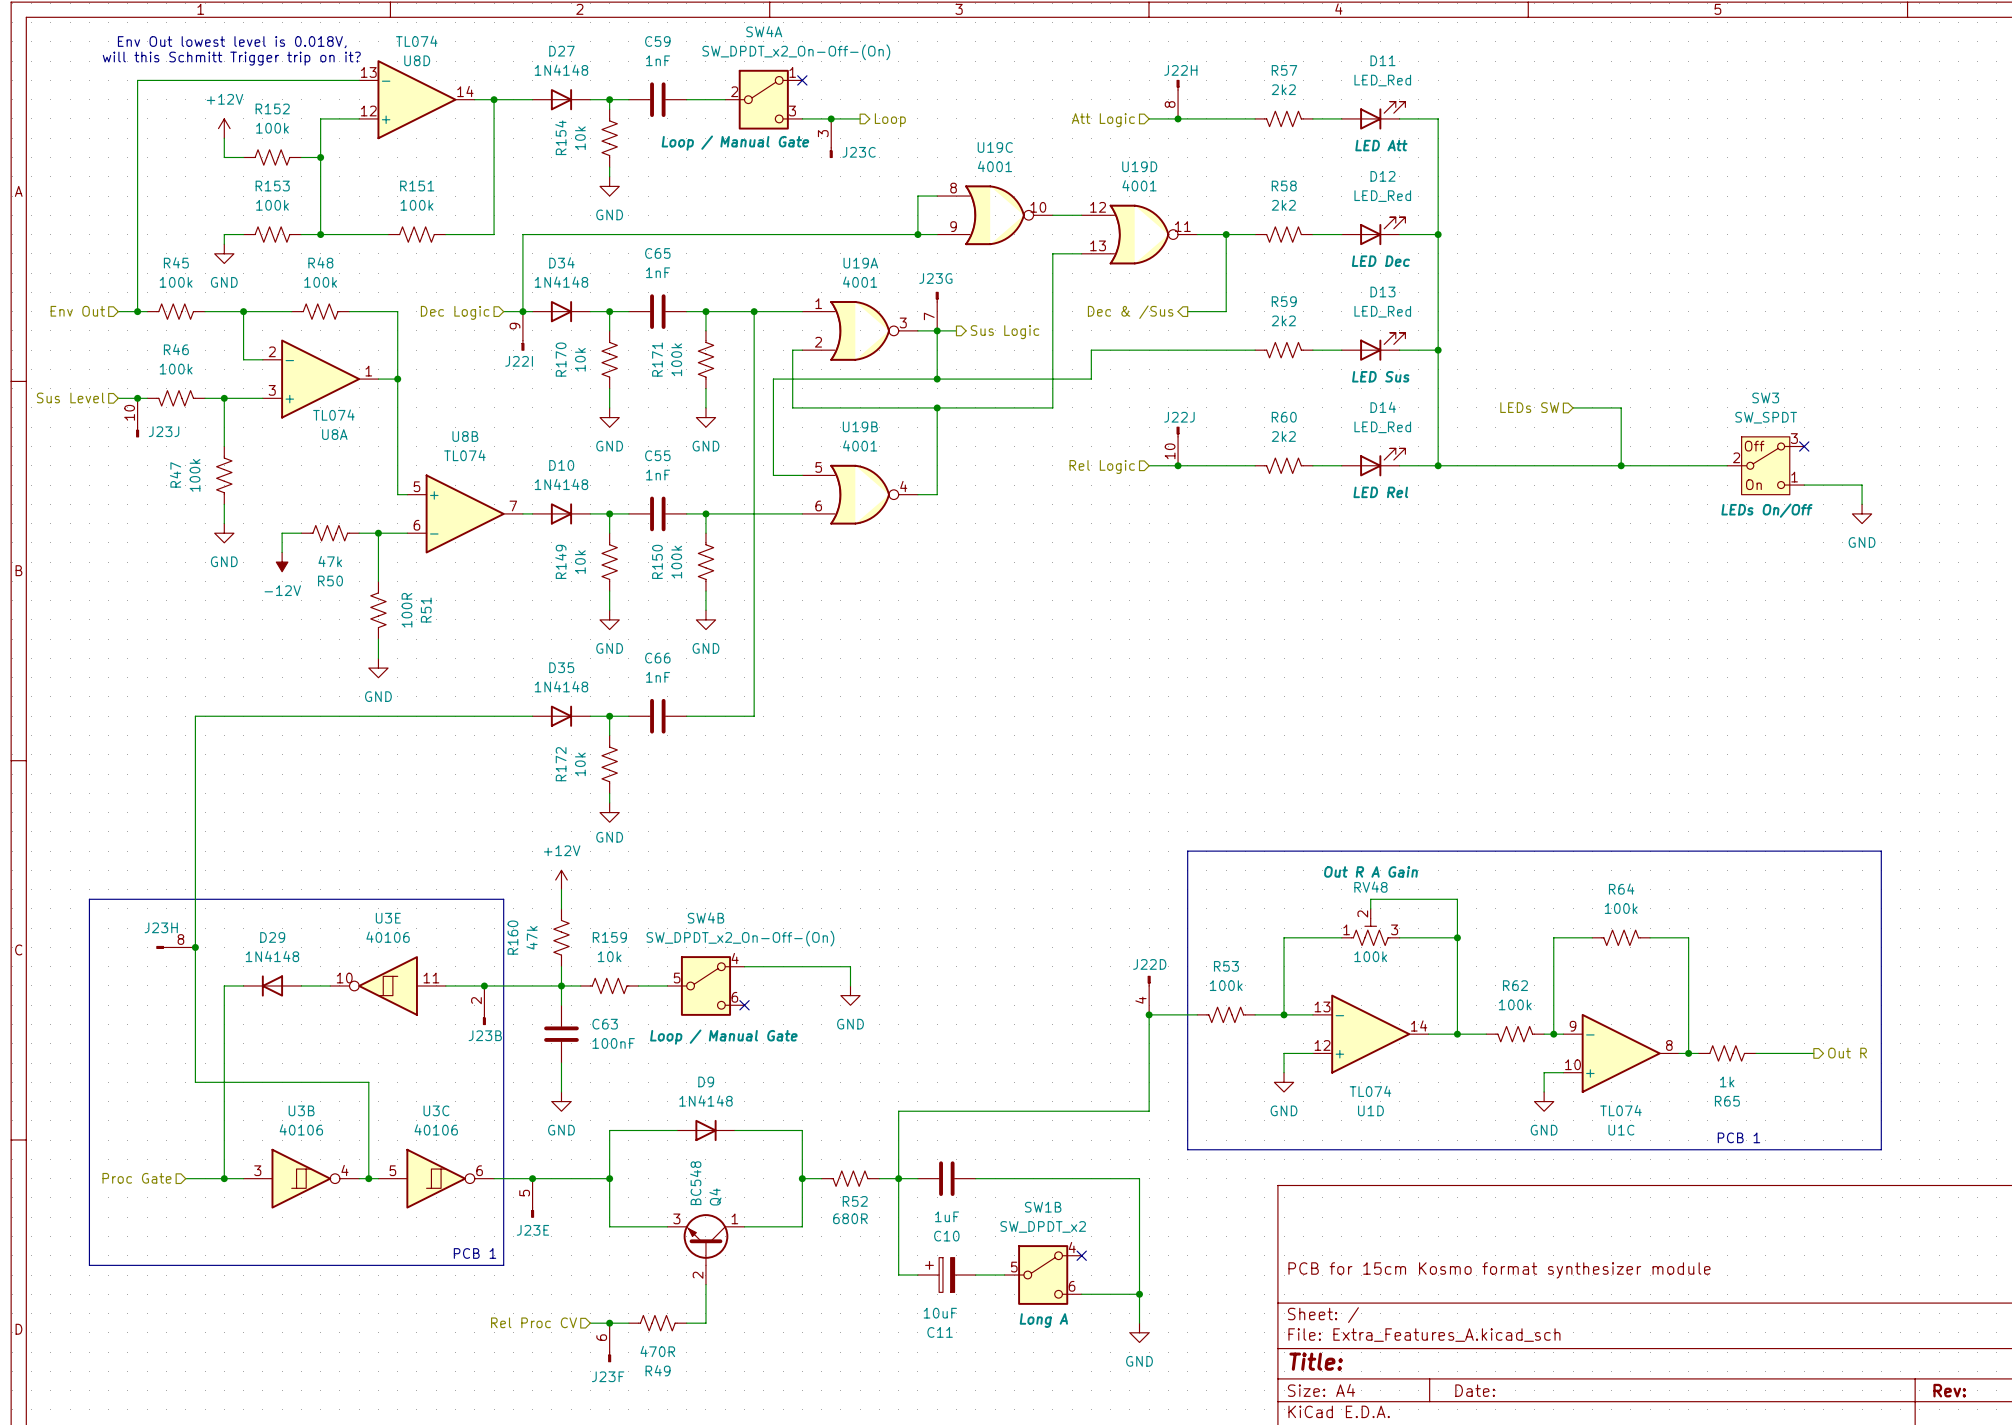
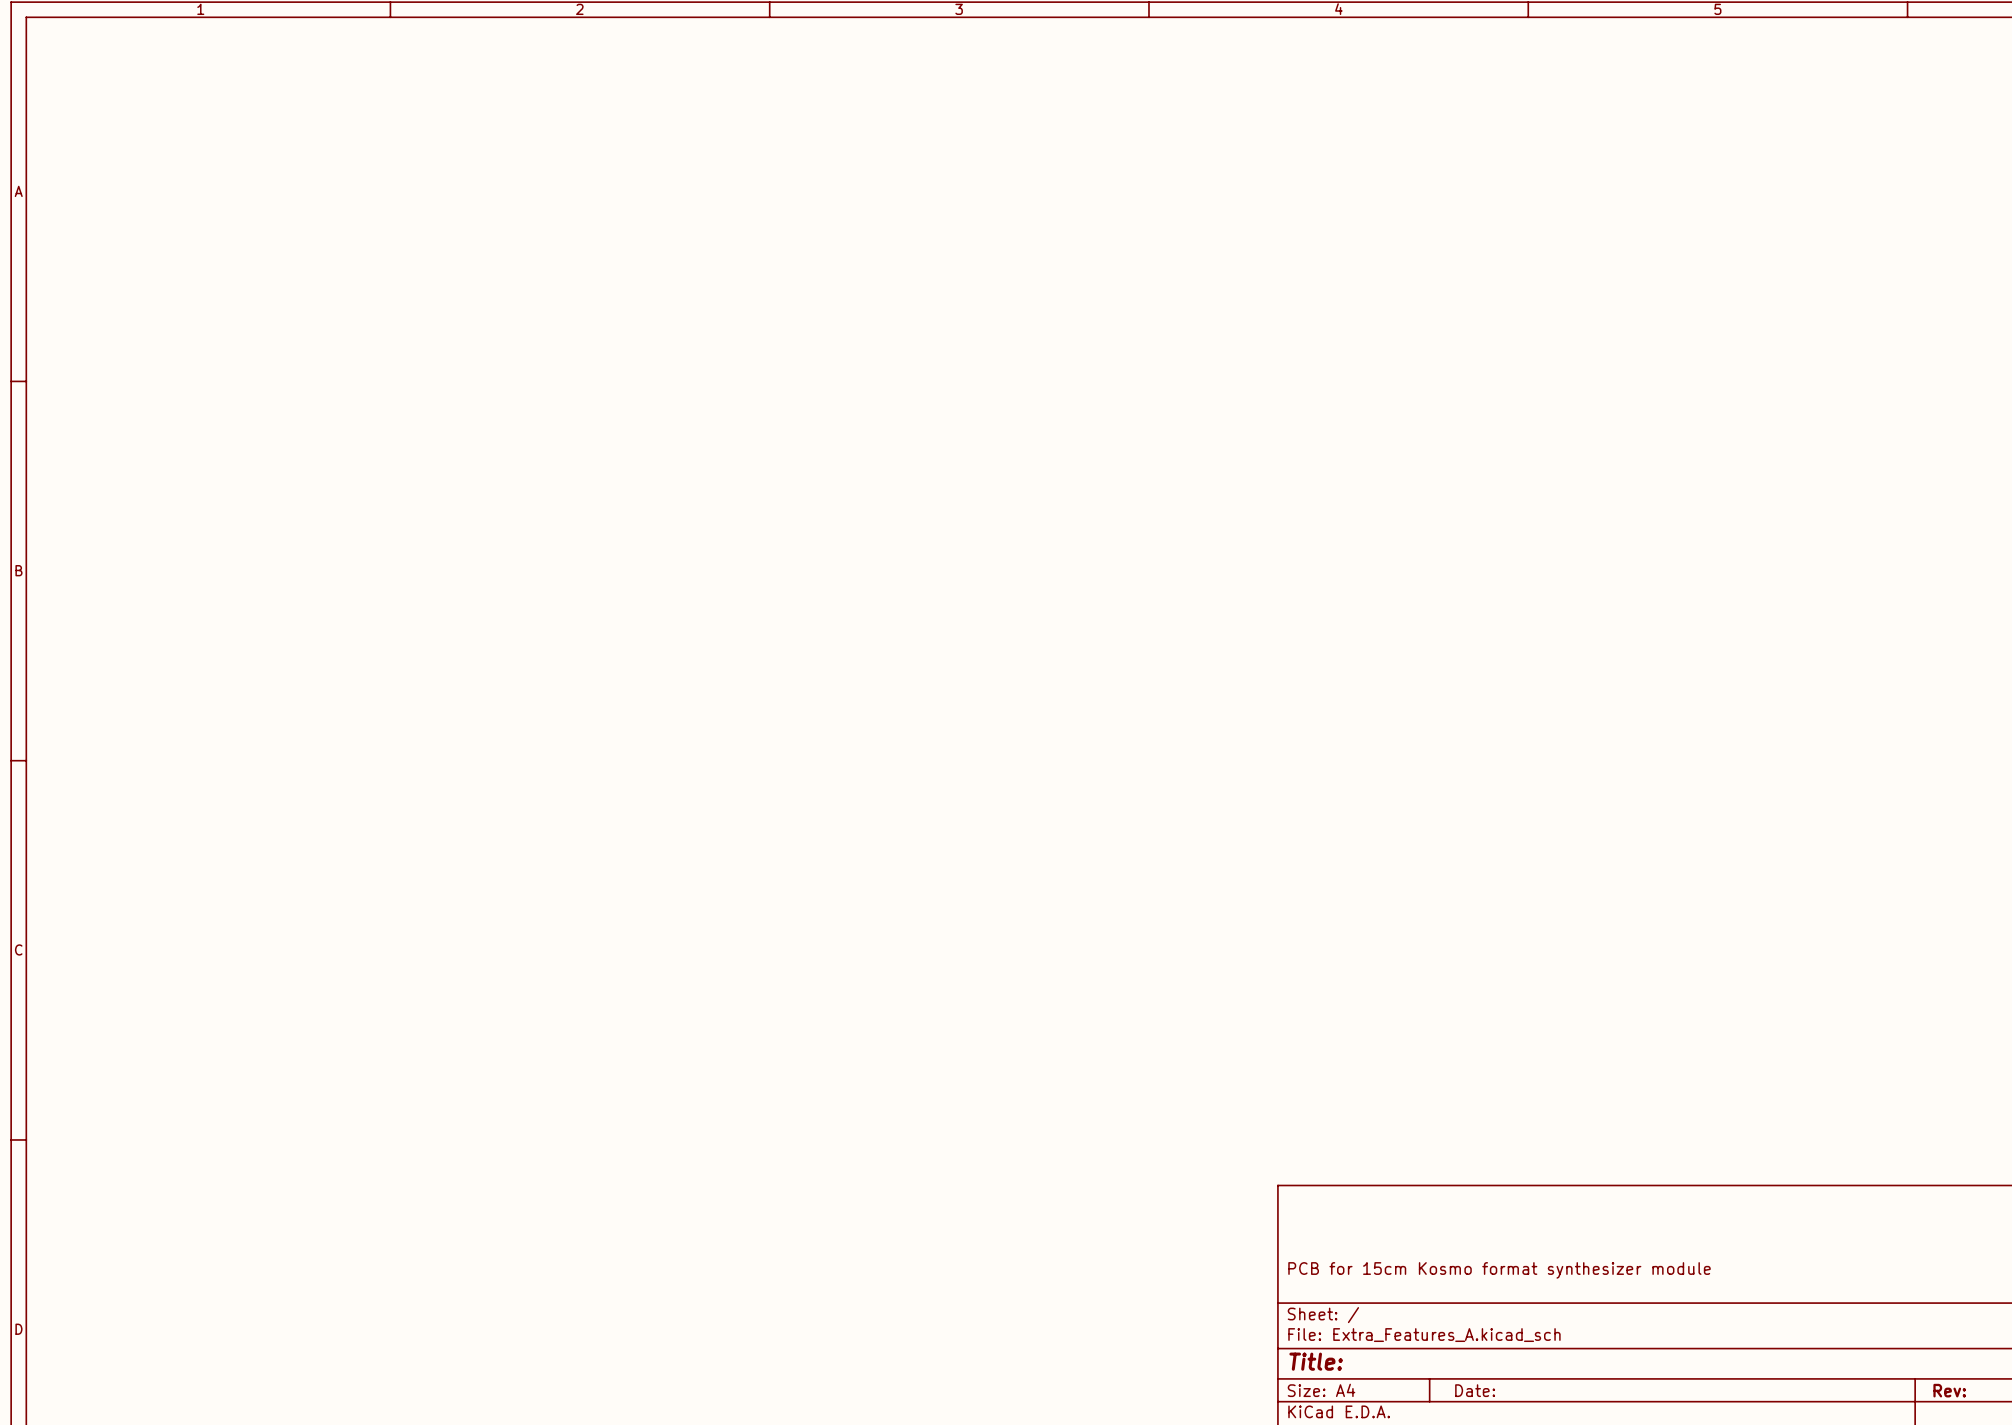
text: Env Out lowest level is 0.018V, (232, 42) -> none
text: will this Schmitt Trigger trip on it? (231, 58) -> none
wire: (359, 80) (137, 80) (137, 311) -> none
no-connect mark: (802, 80) -> none
U8D: TL074 (416, 99) -> none
wire: (474, 99) (532, 99) -> none
wire: (494, 99) (494, 234) (445, 234) -> none
junction: (494, 99) -> none
D27: 1N4148 (561, 99) -> none
wire: (590, 99) (628, 99) -> none
wire: (609, 99) (609, 109) -> none
junction: (609, 99) -> none
C59: 1nF (657, 99) -> none
wire: (686, 99) (725, 99) -> none
SW4A: SW_DPDT_x2_On-Off-(On) (763, 99) -> none
J22H: (1178, 99) -> none
D11: LED_Red (1373, 115) -> none
wire: (359, 118) (320, 118) (320, 234) -> none
wire: (802, 118) (860, 118) -> none
junction: (831, 118) -> none
wire: (1149, 118) (1255, 118) -> none
junction: (1178, 118) -> none
R57: 2k2 (1284, 118) -> none
wire: (1312, 118) (1341, 118) -> none
wire: (1399, 118) (1438, 118) (1438, 465) -> none
hierarchical label: Loop (890, 120) -> none
hierarchical label: Att Logic (1103, 120) -> none
power symbol: +12V (224, 128) -> none
wire: (224, 138) (224, 157) (243, 157) -> none
R154: 10k (609, 138) -> none
J23C: (831, 138) -> none
R152: 100k (272, 157) -> none
wire: (301, 157) (320, 157) -> none
junction: (320, 157) -> none
wire: (609, 167) (609, 176) -> none
power symbol: GND (609, 186) -> none
wire: (937, 196) (917, 196) (917, 234) -> none
U19C: 4001 (995, 215) -> none
wire: (1052, 215) (1081, 215) -> none
D12: LED_Red (1373, 231) -> none
wire: (243, 234) (224, 234) (224, 244) -> none
R153: 100k (272, 234) -> none
wire: (301, 234) (388, 234) -> none
junction: (320, 234) -> none
R151: 100k (416, 234) -> none
junction: (917, 234) -> none
wire: (937, 234) (522, 234) (522, 311) -> none
U19D: 4001 (1139, 234) -> none
wire: (1197, 234) (1255, 234) -> none
wire: (1226, 234) (1226, 311) (1187, 311) -> none
junction: (1226, 234) -> none
R58: 2k2 (1284, 234) -> none
wire: (1312, 234) (1341, 234) -> none
wire: (1399, 234) (1438, 234) -> none
junction: (1438, 234) -> none
power symbol: GND (224, 253) -> none
wire: (1081, 253) (1052, 253) (1052, 407) (792, 407) (792, 350) (802, 350) -> none
hierarchical label: Env Out (77, 311) -> none
wire: (118, 311) (147, 311) -> none
junction: (137, 311) -> none
R45: 100k (176, 311) -> none
wire: (205, 311) (291, 311) -> none
wire: (243, 311) (243, 359) (262, 359) -> none
junction: (243, 311) -> none
R48: 100k (320, 311) -> none
wire: (349, 311) (397, 311) (397, 494) (407, 494) -> none
wire: (503, 311) (532, 311) -> none
junction: (522, 311) -> none
D34: 1N4148 (561, 311) -> none
wire: (590, 311) (628, 311) -> none
wire: (609, 311) (609, 330) -> none
junction: (609, 311) -> none
C65: 1nF (657, 311) -> none
wire: (686, 311) (802, 311) -> none
wire: (705, 311) (705, 330) -> none
junction: (705, 311) -> none
wire: (754, 311) (754, 716) (686, 716) -> none
junction: (754, 311) -> none
J23G: (937, 311) -> none
hierarchical label: Dec Logic (455, 312) -> none
hierarchical label: Dec & /Sus (1130, 312) -> none
U19A: 4001 (860, 330) -> none
wire: (917, 330) (956, 330) -> none
wire: (937, 330) (937, 379) -> none
junction: (937, 330) -> none
J22I: (522, 331) -> none
hierarchical label: Sus Logic (1005, 332) -> none
D13: LED_Red (1373, 346) -> none
wire: (1255, 350) (1091, 350) (1091, 379) (773, 379) (773, 475) (802, 475) -> none
R59: 2k2 (1284, 350) -> none
wire: (1312, 350) (1341, 350) -> none
wire: (1399, 350) (1438, 350) -> none
junction: (1438, 350) -> none
R170: 10k (609, 359) -> none
R171: 100k (705, 359) -> none
U8A: TL074 (320, 379) -> none
wire: (378, 379) (397, 379) -> none
junction: (397, 379) -> none
junction: (937, 379) -> none
wire: (609, 388) (609, 407) -> none
wire: (705, 388) (705, 407) -> none
hierarchical label: Sus Level (70, 397) -> none
wire: (118, 398) (147, 398) -> none
junction: (137, 398) -> none
R46: 100k (176, 398) -> none
wire: (205, 398) (262, 398) -> none
wire: (224, 398) (224, 446) -> none
junction: (224, 398) -> none
wire: (937, 407) (937, 494) (917, 494) -> none
junction: (937, 407) -> none
hierarchical label: LEDs SW (1529, 407) -> none
wire: (1573, 407) (1621, 407) (1621, 465) -> none
J23J: (137, 417) -> none
power symbol: GND (609, 417) -> none
power symbol: GND (705, 417) -> none
J22J: (1178, 446) -> none
no-connect mark: (1804, 446) -> none
D14: LED_Red (1373, 462) -> none
wire: (1149, 465) (1255, 465) -> none
junction: (1178, 465) -> none
R60: 2k2 (1284, 465) -> none
wire: (1312, 465) (1341, 465) -> none
wire: (1399, 465) (1727, 465) -> none
junction: (1438, 465) -> none
junction: (1621, 465) -> none
SW3: SW_SPDT (1765, 465) -> none
hierarchical label: Rel Logic (1102, 467) -> none
R47: 100k (224, 475) -> none
wire: (1804, 485) (1862, 485) (1862, 504) -> none
U19B: 4001 (860, 494) -> none
wire: (224, 504) (224, 523) -> none
U8B: TL074 (465, 513) -> none
wire: (522, 513) (532, 513) -> none
D10: 1N4148 (561, 513) -> none
wire: (590, 513) (628, 513) -> none
wire: (609, 513) (609, 533) -> none
junction: (609, 513) -> none
C55: 1nF (657, 513) -> none
wire: (686, 513) (802, 513) -> none
wire: (705, 513) (705, 533) -> none
junction: (705, 513) -> none
power symbol: GND (1862, 513) -> none
power symbol: GND (224, 533) -> none
wire: (301, 533) (282, 533) (282, 552) -> none
R50: 47k (330, 533) -> none
wire: (359, 533) (407, 533) -> none
wire: (378, 533) (378, 581) -> none
junction: (378, 533) -> none
power symbol: -12V (282, 562) -> none
R149: 10k (609, 562) -> none
R150: 100k (705, 562) -> none
wire: (609, 591) (609, 610) -> none
wire: (705, 591) (705, 610) -> none
R51: 100R (378, 610) -> none
power symbol: GND (609, 619) -> none
power symbol: GND (705, 619) -> none
wire: (378, 639) (378, 658) -> none
power symbol: GND (378, 668) -> none
wire: (532, 716) (195, 716) (195, 1082) (368, 1082) (368, 1178) -> none
D35: 1N4148 (561, 716) -> none
wire: (590, 716) (628, 716) -> none
wire: (609, 716) (609, 735) -> none
junction: (609, 716) -> none
C66: 1nF (657, 716) -> none
R172: 10k (609, 764) -> none
wire: (609, 793) (609, 802) -> none
power symbol: GND (609, 812) -> none
line: (1187, 851) (1881, 851) (1881, 1149) (1187, 1149) (1187, 851) -> none
power symbol: +12V (561, 880) -> none
wire: (561, 889) (561, 908) -> none
line: (89, 899) (503, 899) (503, 1265) (89, 1265) (89, 899) -> none
wire: (1370, 908) (1370, 899) (1457, 899) (1457, 1034) -> none
RV48: 100k (1370, 927) -> none
R160: 47k (561, 937) -> none
wire: (1341, 937) (1284, 937) (1284, 1014) -> none
wire: (1399, 937) (1457, 937) -> none
junction: (1457, 937) -> none
wire: (1592, 937) (1553, 937) (1553, 1034) -> none
R64: 100k (1621, 937) -> none
wire: (1650, 937) (1688, 937) (1688, 1053) -> none
J23H: (175, 947) -> none
junction: (195, 947) -> none
wire: (561, 966) (561, 1005) -> none
wire: (744, 966) (850, 966) (850, 985) -> none
wire: (243, 985) (224, 985) (224, 1178) -> none
D29: 1N4148 (272, 985) -> none
wire: (301, 985) (330, 985) -> none
U3E: 40106 (388, 985) -> none
wire: (445, 985) (580, 985) -> none
junction: (484, 985) -> none
junction: (561, 985) -> none
R159: 10k (609, 985) -> none
wire: (638, 985) (667, 985) -> none
SW4B: SW_DPDT_x2_On-Off-(On) (705, 985) -> none
power symbol: GND (850, 995) -> none
J22D: (1149, 995) -> none
J23B: (484, 1005) -> none
no-connect mark: (744, 1005) -> none
junction: (1149, 1014) -> none
wire: (1197, 1014) (1149, 1014) (1149, 1111) (898, 1111) (898, 1275) (917, 1275) -> none
R53: 100k (1226, 1014) -> none
wire: (1255, 1014) (1312, 1014) -> none
junction: (1284, 1014) -> none
C63: 100nF (561, 1034) -> none
U1D: TL074 (1370, 1034) -> none
wire: (1428, 1034) (1486, 1034) -> none
junction: (1457, 1034) -> none
R62: 100k (1515, 1034) -> none
wire: (1544, 1034) (1563, 1034) -> none
junction: (1553, 1034) -> none
wire: (1312, 1053) (1284, 1053) (1284, 1072) -> none
U1C: TL074 (1621, 1053) -> none
wire: (1678, 1053) (1698, 1053) -> none
junction: (1688, 1053) -> none
R65: 1k (1727, 1053) -> none
wire: (1756, 1053) (1813, 1053) -> none
hierarchical label: Out R (1847, 1053) -> none
wire: (561, 1063) (561, 1091) -> none
wire: (1563, 1072) (1544, 1072) (1544, 1091) -> none
power symbol: GND (1284, 1082) -> none
power symbol: GND (561, 1101) -> none
power symbol: GND (1544, 1101) -> none
wire: (677, 1130) (609, 1130) (609, 1226) (667, 1226) -> none
D9: 1N4148 (705, 1130) -> none
wire: (734, 1130) (802, 1130) (802, 1226) (744, 1226) -> none
text: PCB 1 (1738, 1137) -> none
hierarchical label: Proc Gate (136, 1178) -> none
wire: (185, 1178) (243, 1178) -> none
junction: (224, 1178) -> none
U3B: 40106 (301, 1178) -> none
wire: (359, 1178) (378, 1178) -> none
junction: (368, 1178) -> none
U3C: 40106 (436, 1178) -> none
wire: (494, 1178) (609, 1178) -> none
junction: (532, 1178) -> none
junction: (609, 1178) -> none
wire: (802, 1178) (821, 1178) -> none
junction: (802, 1178) -> none
R52: 680R (850, 1178) -> none
wire: (879, 1178) (917, 1178) -> none
junction: (898, 1178) -> none
C10: 1uF (946, 1178) -> none
wire: (975, 1178) (1139, 1178) (1139, 1323) -> none
J23E: (532, 1198) -> none
Q4: BC548 (705, 1249) -> none
text: PCB 1 (475, 1253) -> none
no-connect mark: (1081, 1255) -> none
C11: 10uF (946, 1275) -> none
wire: (975, 1275) (1004, 1275) -> none
SW1B: SW_DPDT_x2 (1043, 1275) -> none
wire: (705, 1284) (705, 1323) (686, 1323) -> none
wire: (1081, 1294) (1139, 1294) -> none
junction: (1139, 1294) -> none
hierarchical label: Rel Proc CV (534, 1322) -> none
wire: (590, 1323) (628, 1323) -> none
junction: (609, 1323) -> none
R49: 470R (657, 1323) -> none
power symbol: GND (1139, 1332) -> none
J23F: (609, 1342) -> none

